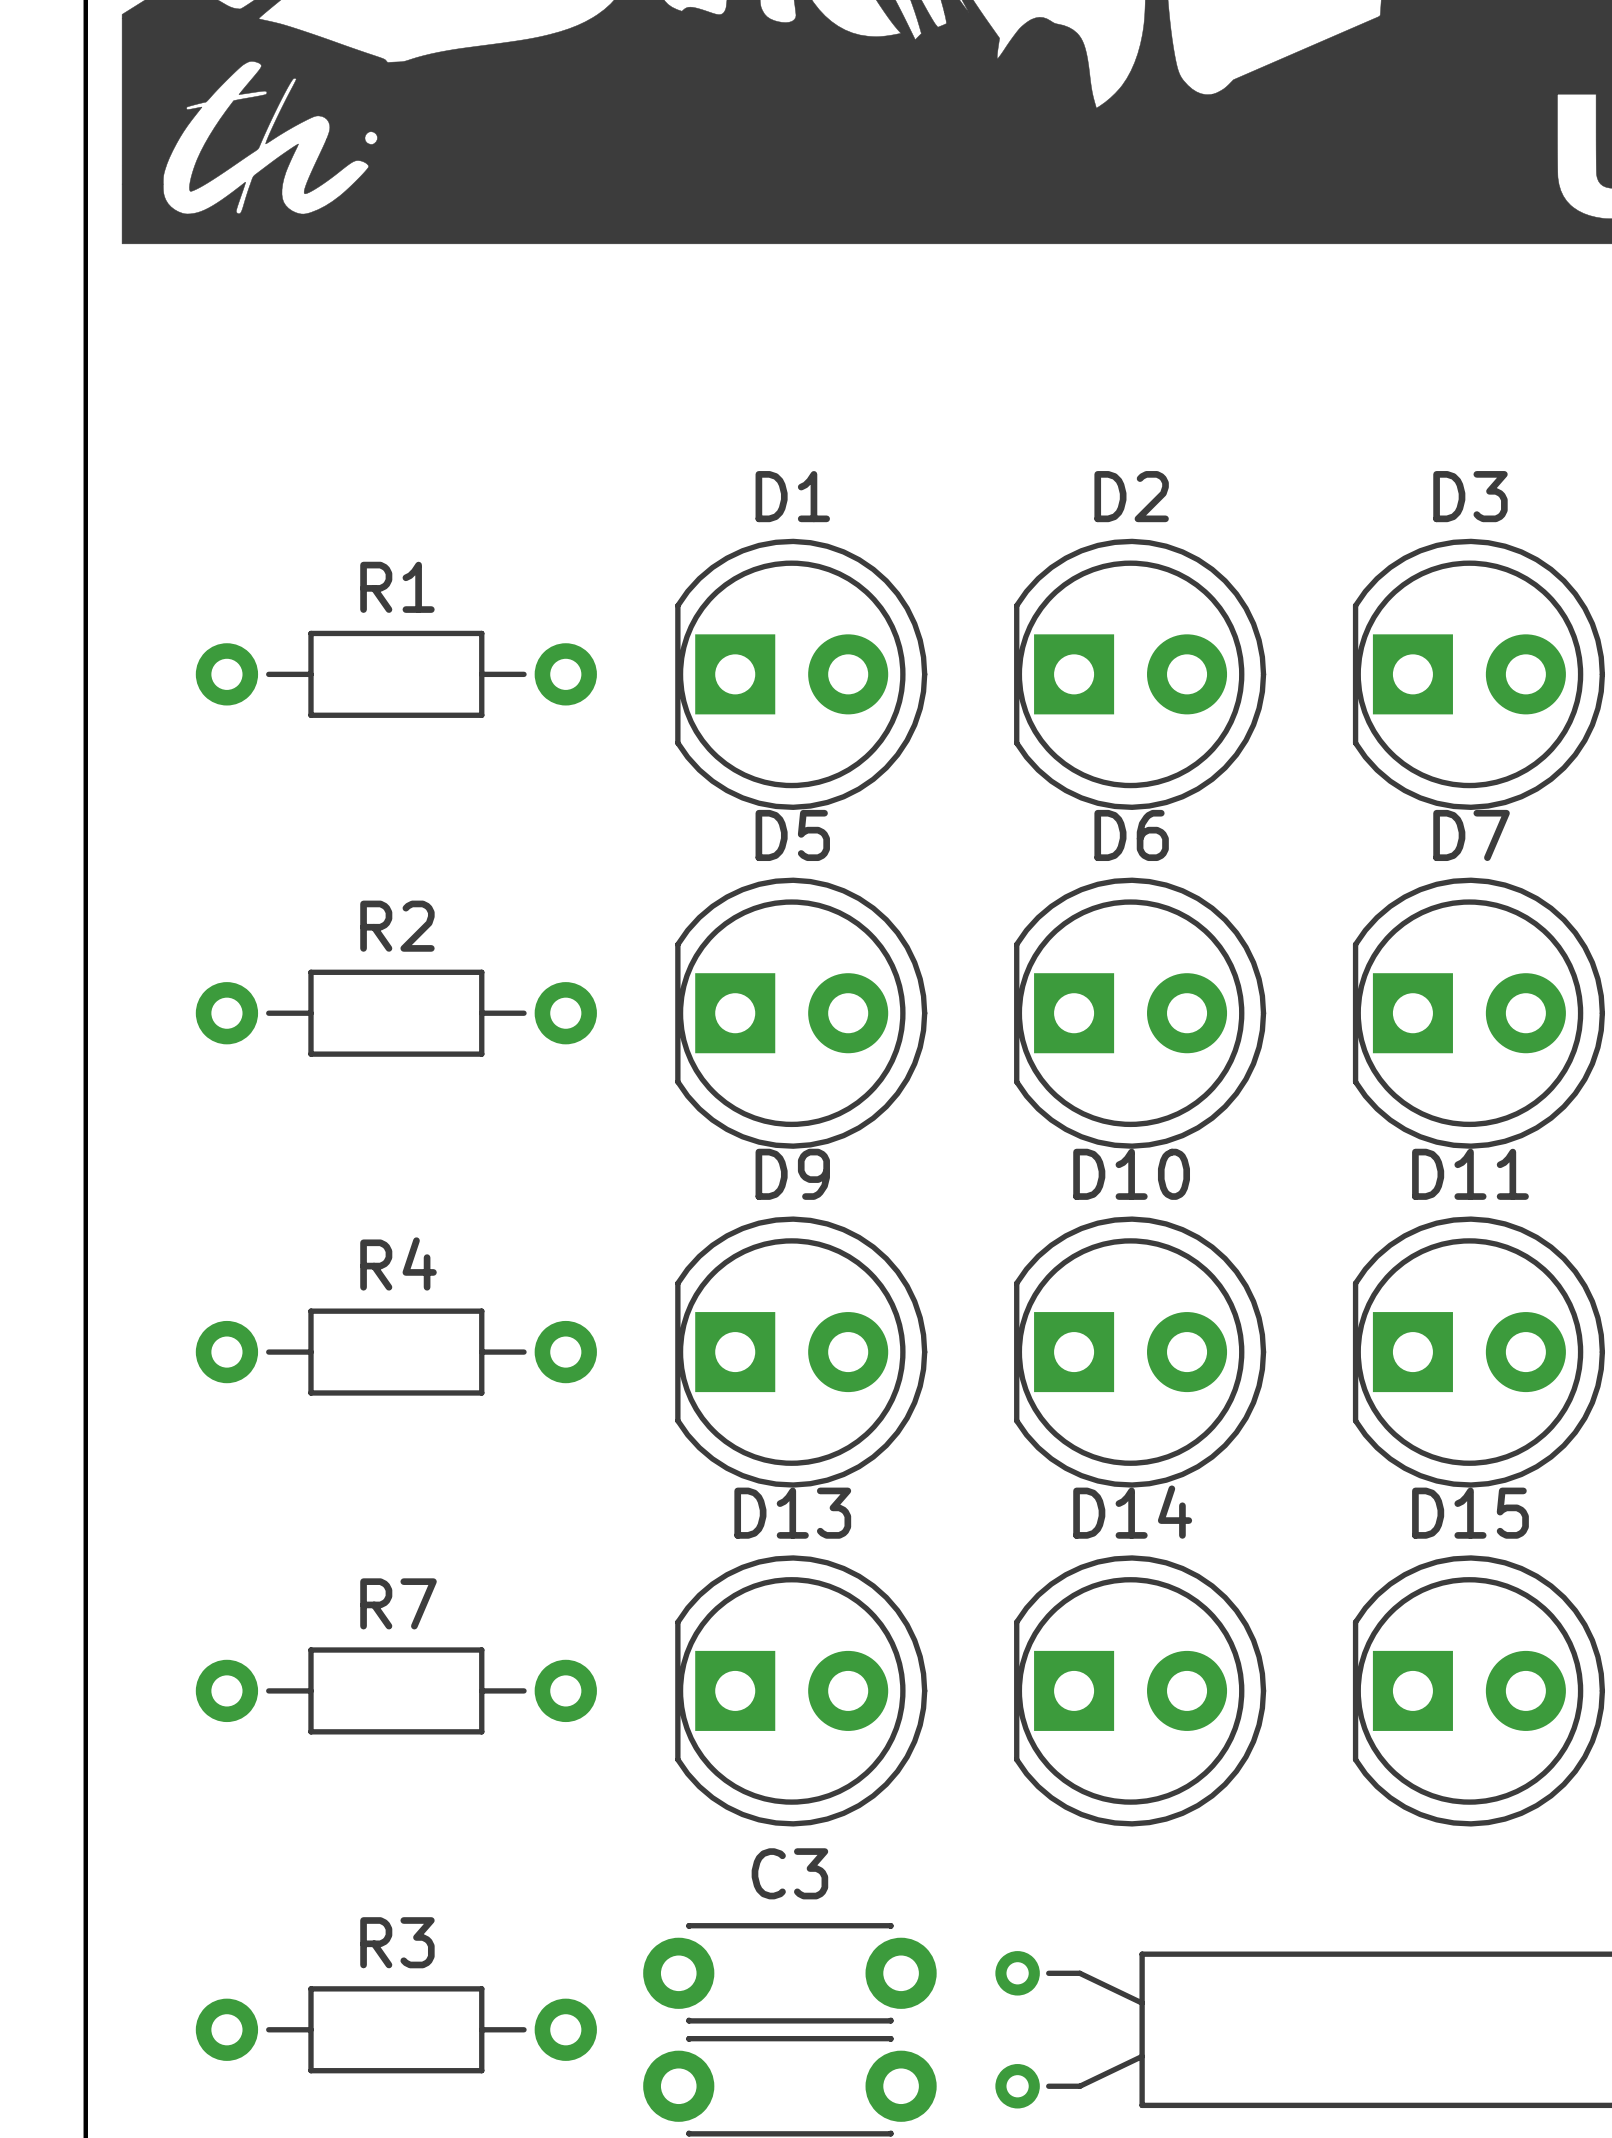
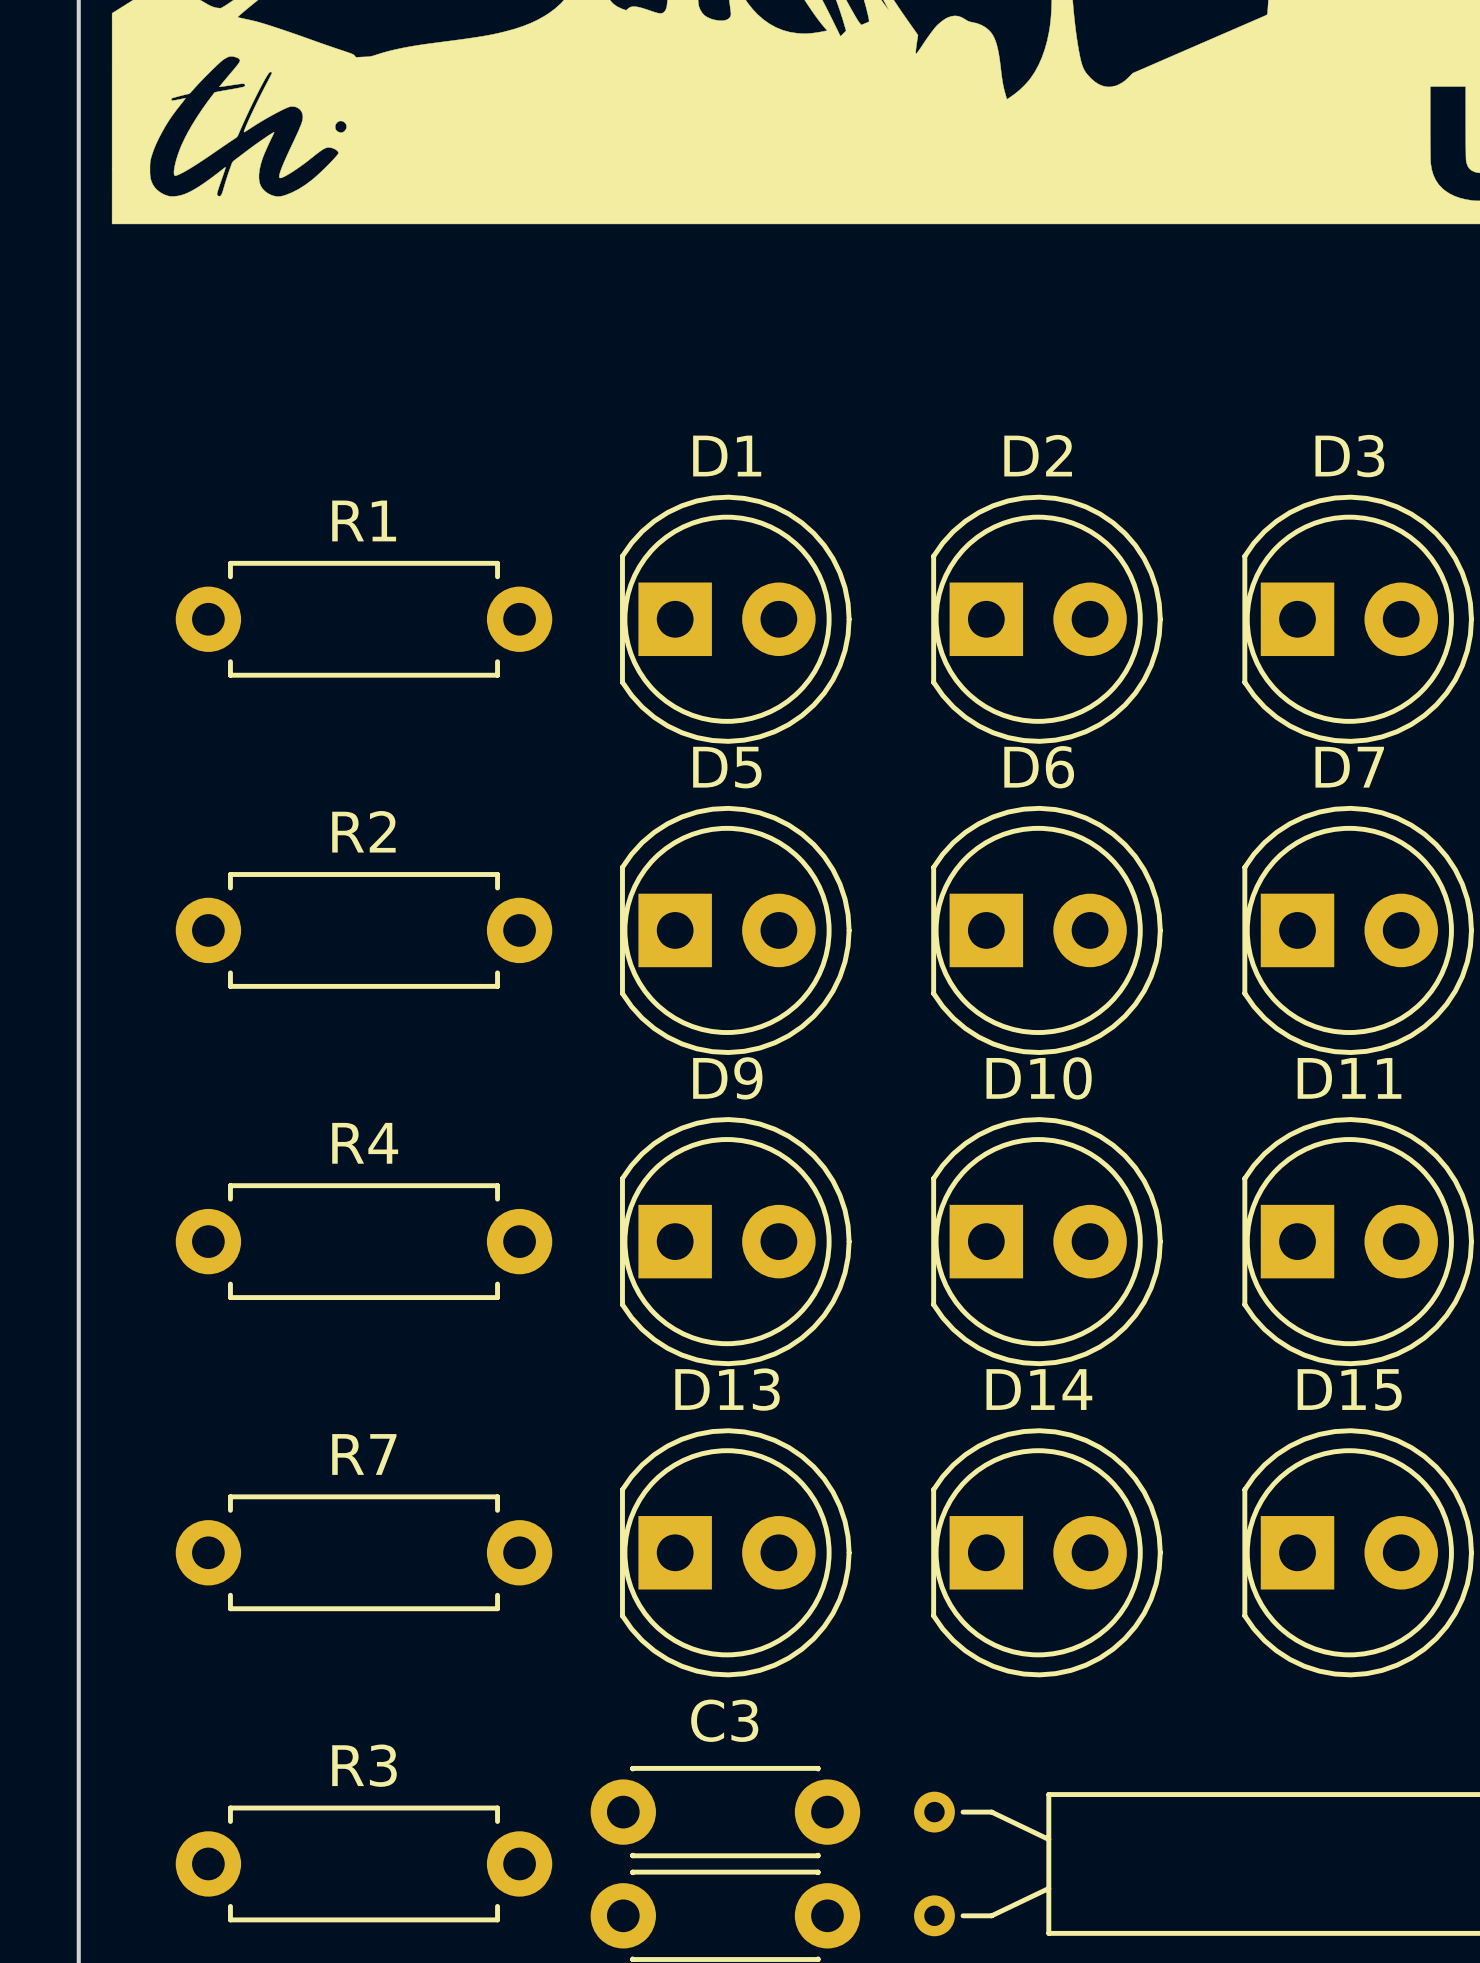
R1 footprint: [195, 630, 597, 718] -> [175, 560, 553, 678]
R2 footprint: [195, 969, 597, 1057] -> [175, 872, 553, 989]
R4 footprint: [195, 1308, 597, 1396] -> [175, 1183, 553, 1301]
R7 footprint: [195, 1647, 597, 1735] -> [175, 1494, 553, 1612]
R3 footprint: [195, 1986, 597, 2074] -> [175, 1805, 553, 1923]

